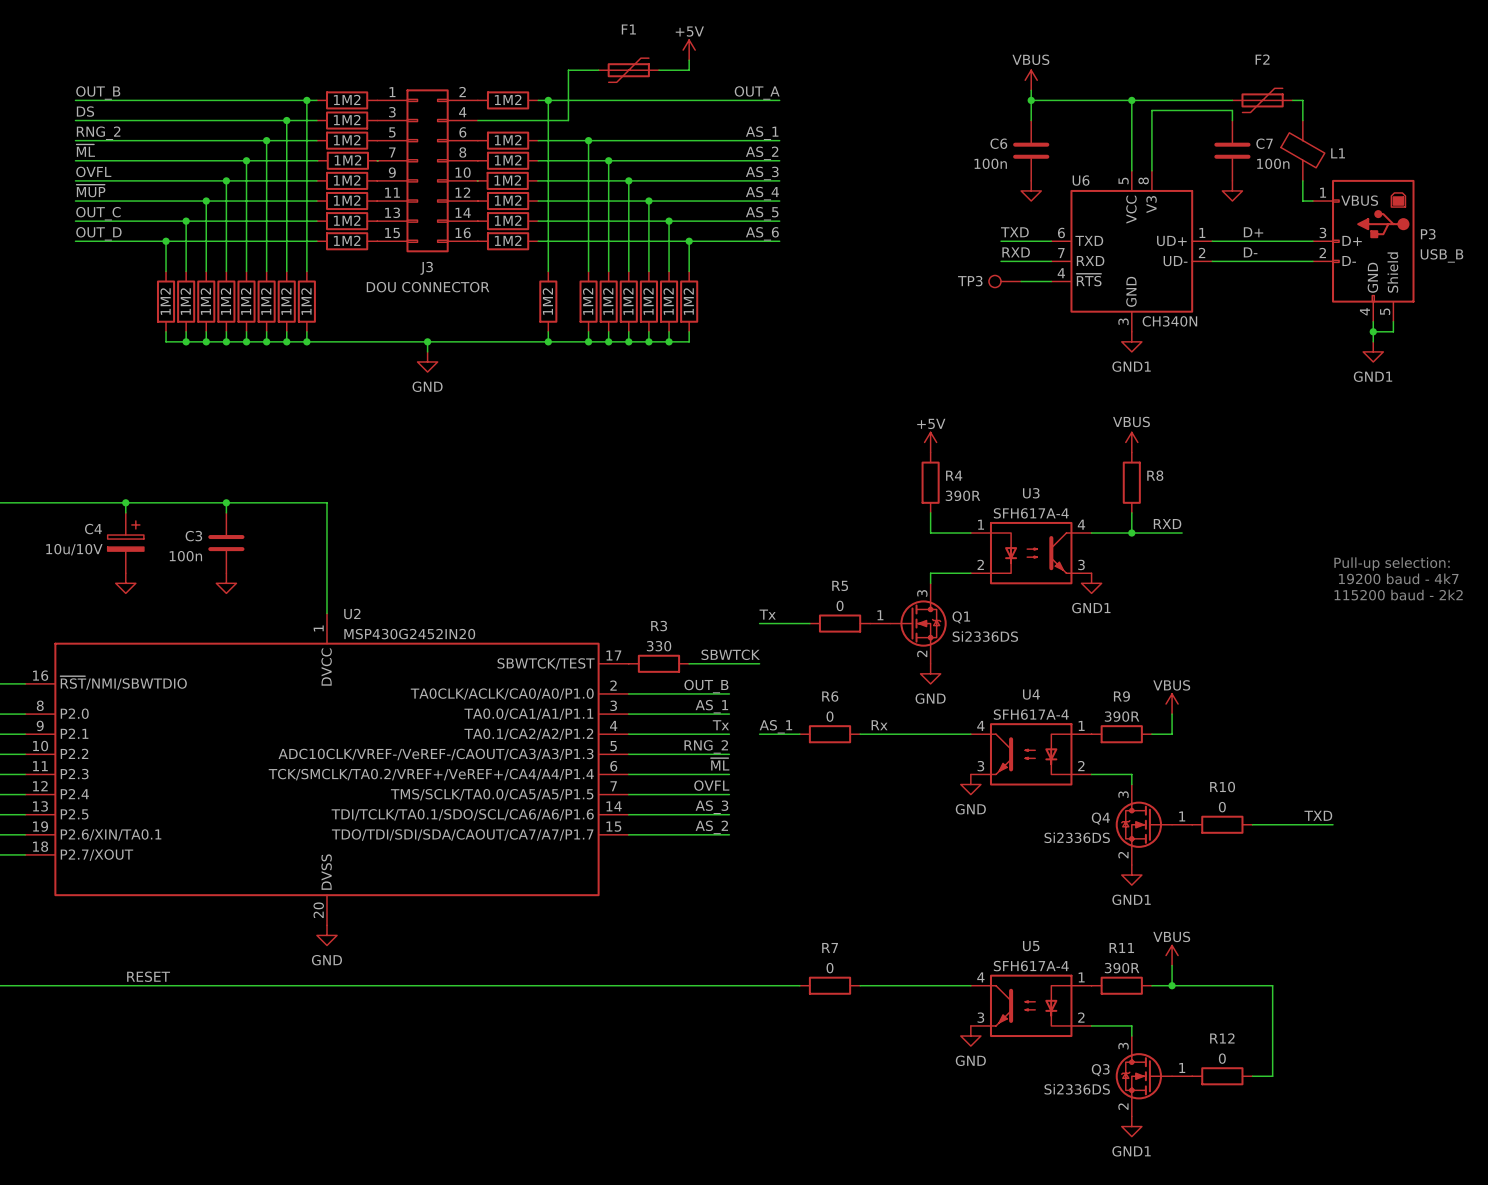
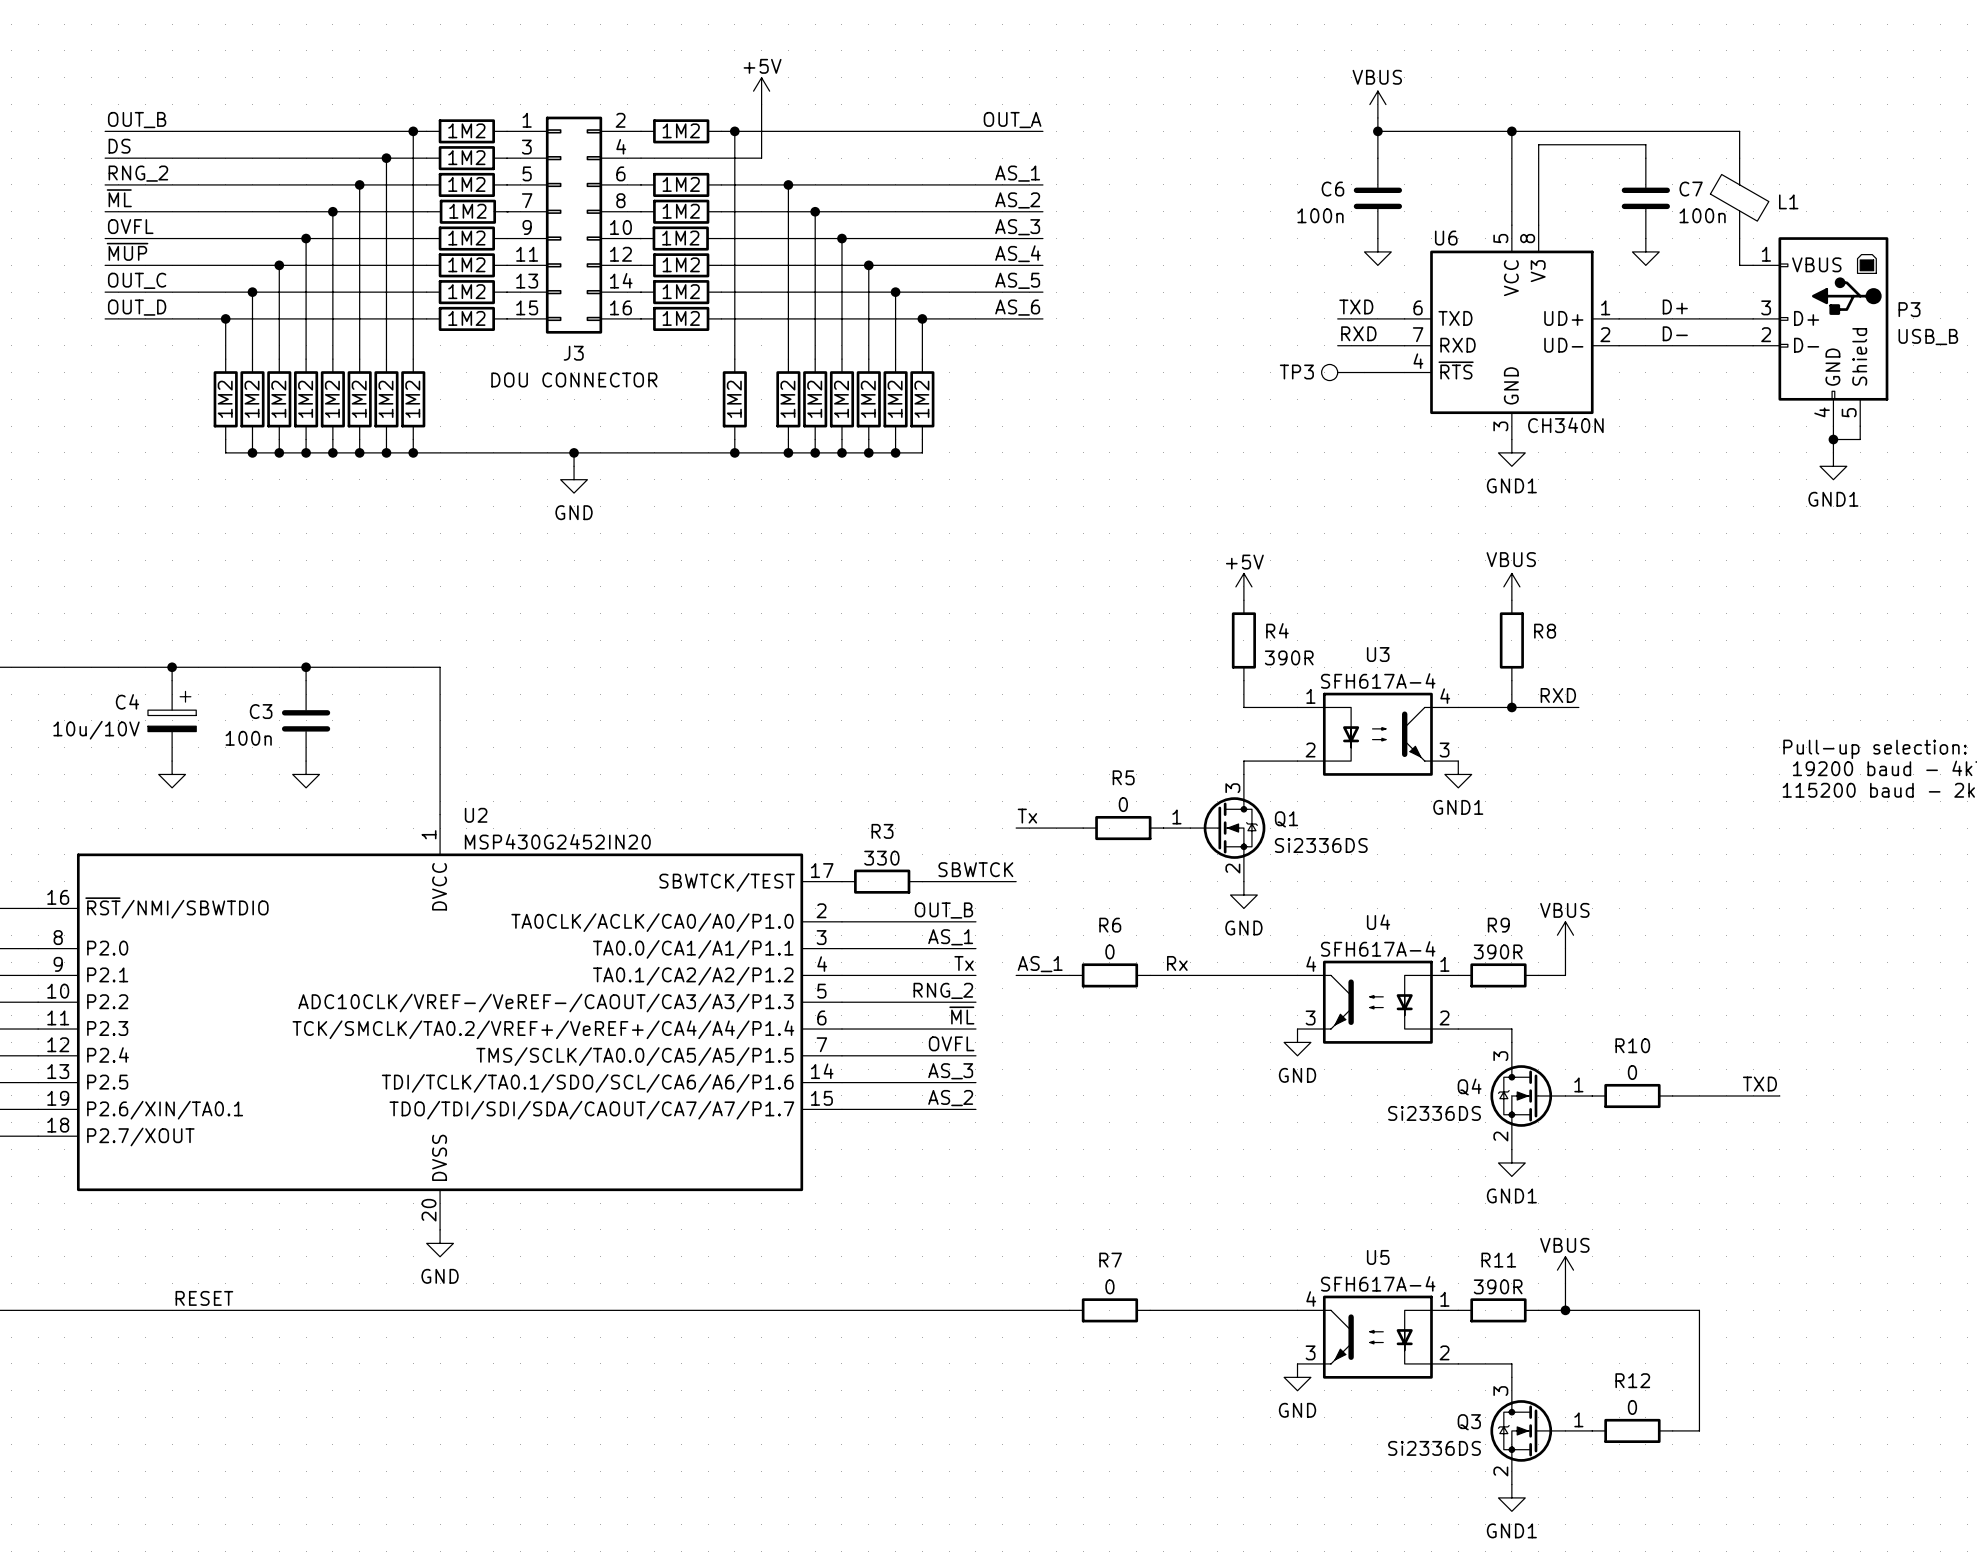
power symbol position: +5V (689, 50) -> +5V (761, 91)
wire: (689, 60) (689, 70) (658, 70) -> none
wire: (598, 70) (568, 70) (568, 80) -> none
F1: (628, 70) -> none
F2: (1262, 100) -> none

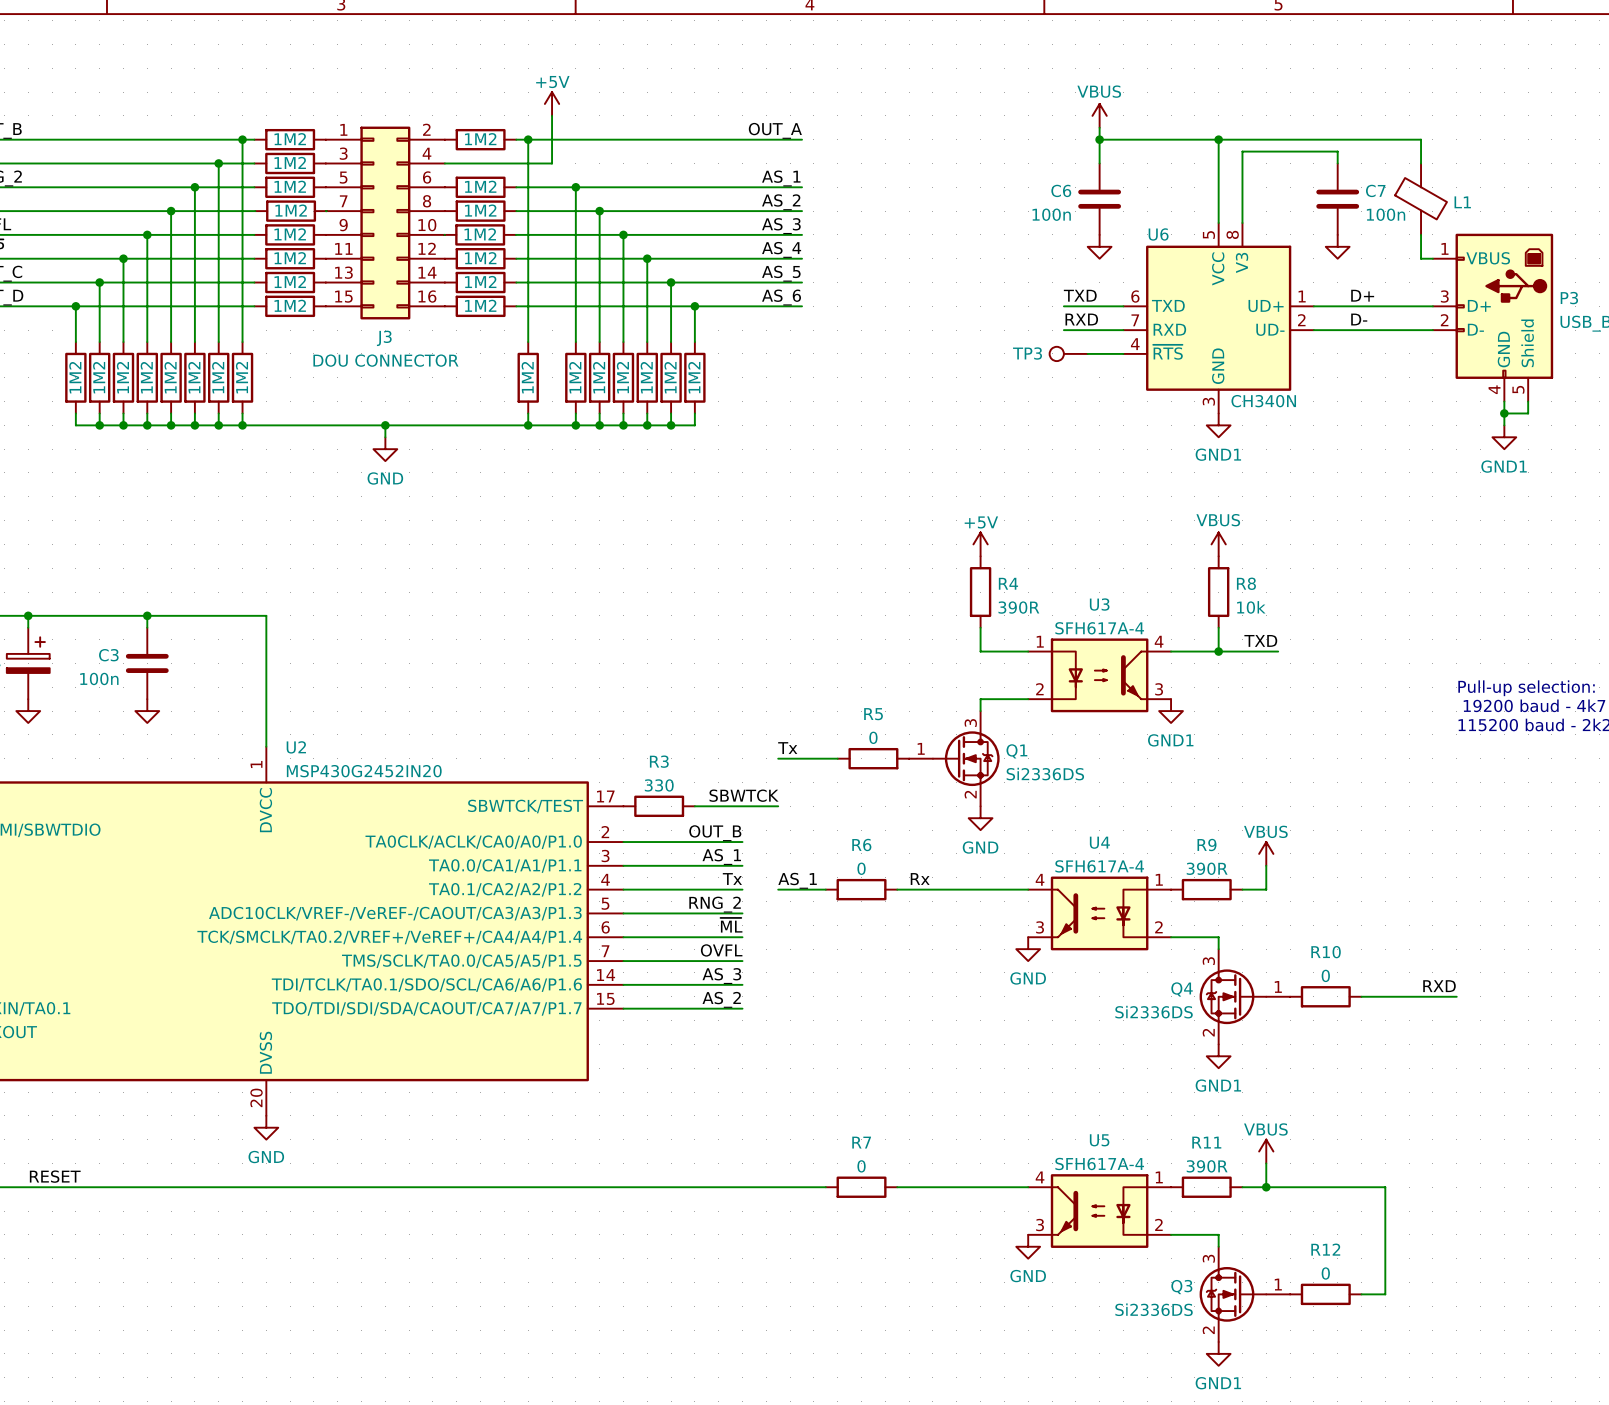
R8 value: none -> 10k (1251, 607)
label: RXD (1558, 695) -> TXD (1260, 640)
label: TXD (1759, 1084) -> RXD (1439, 986)

